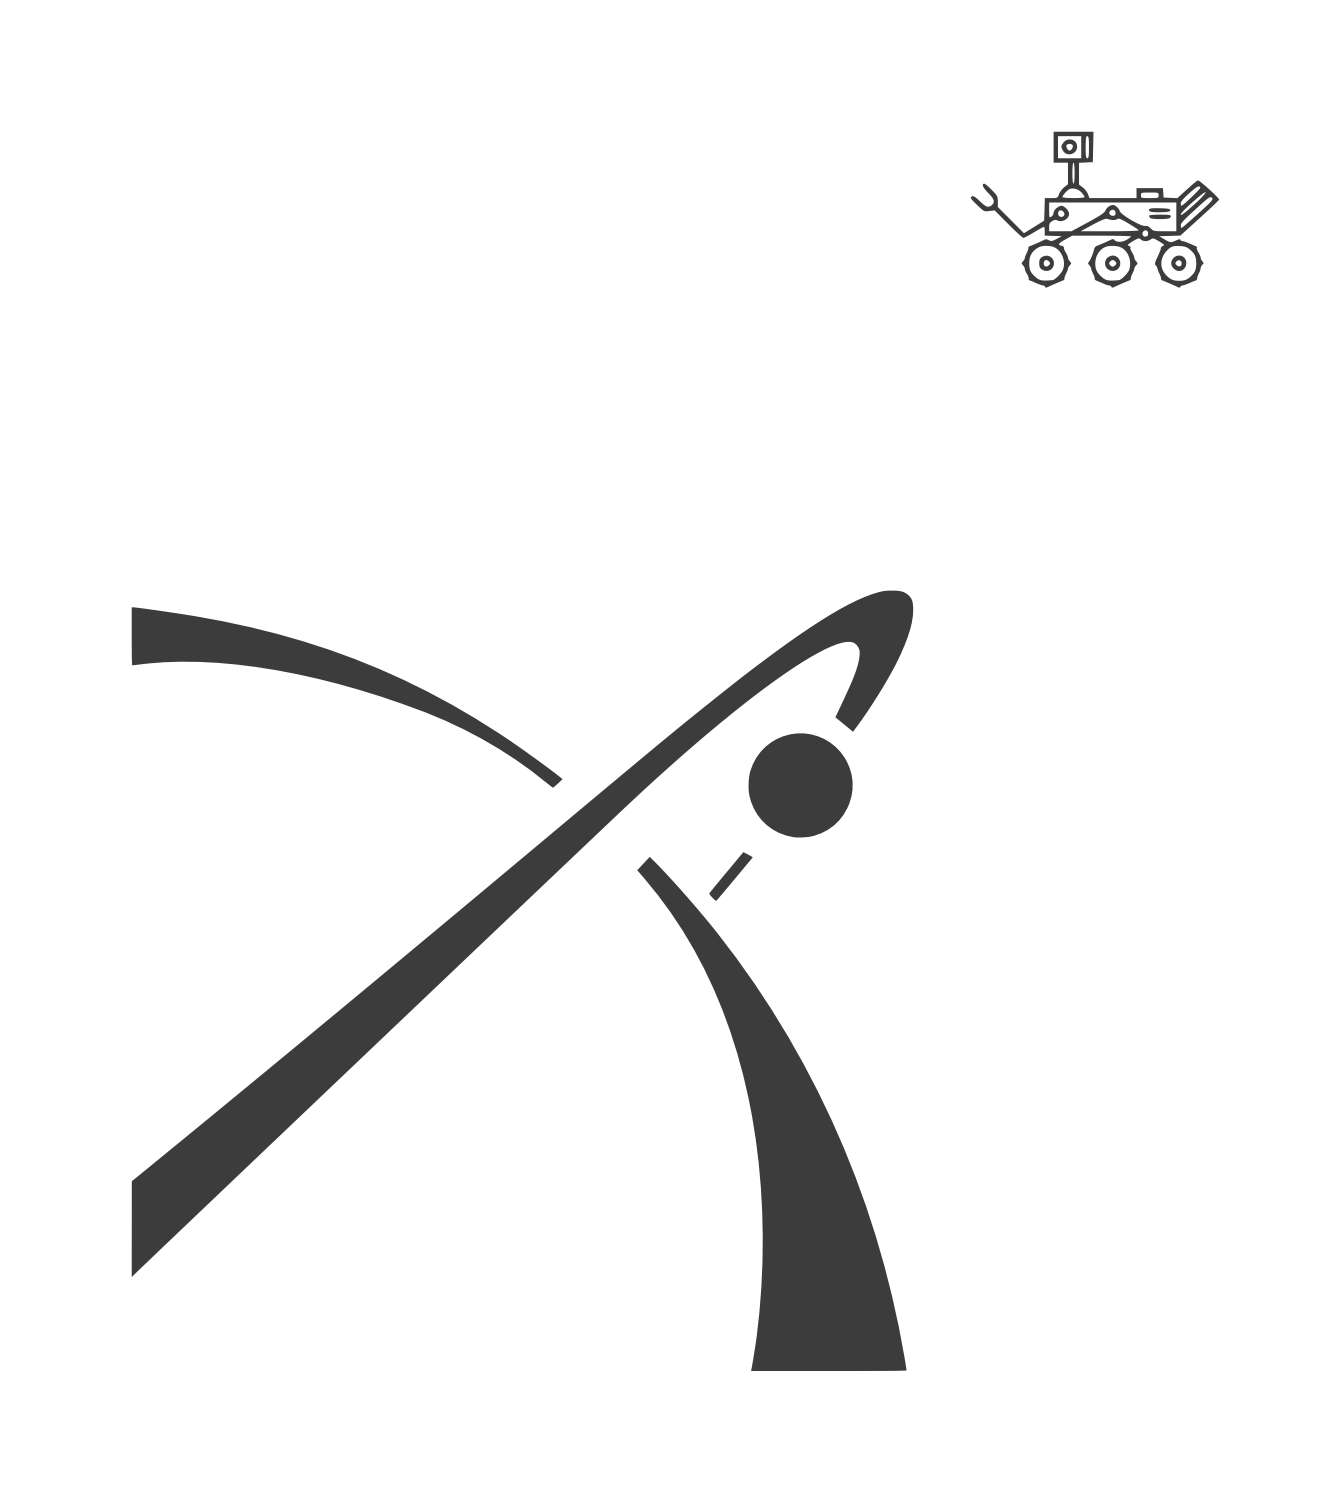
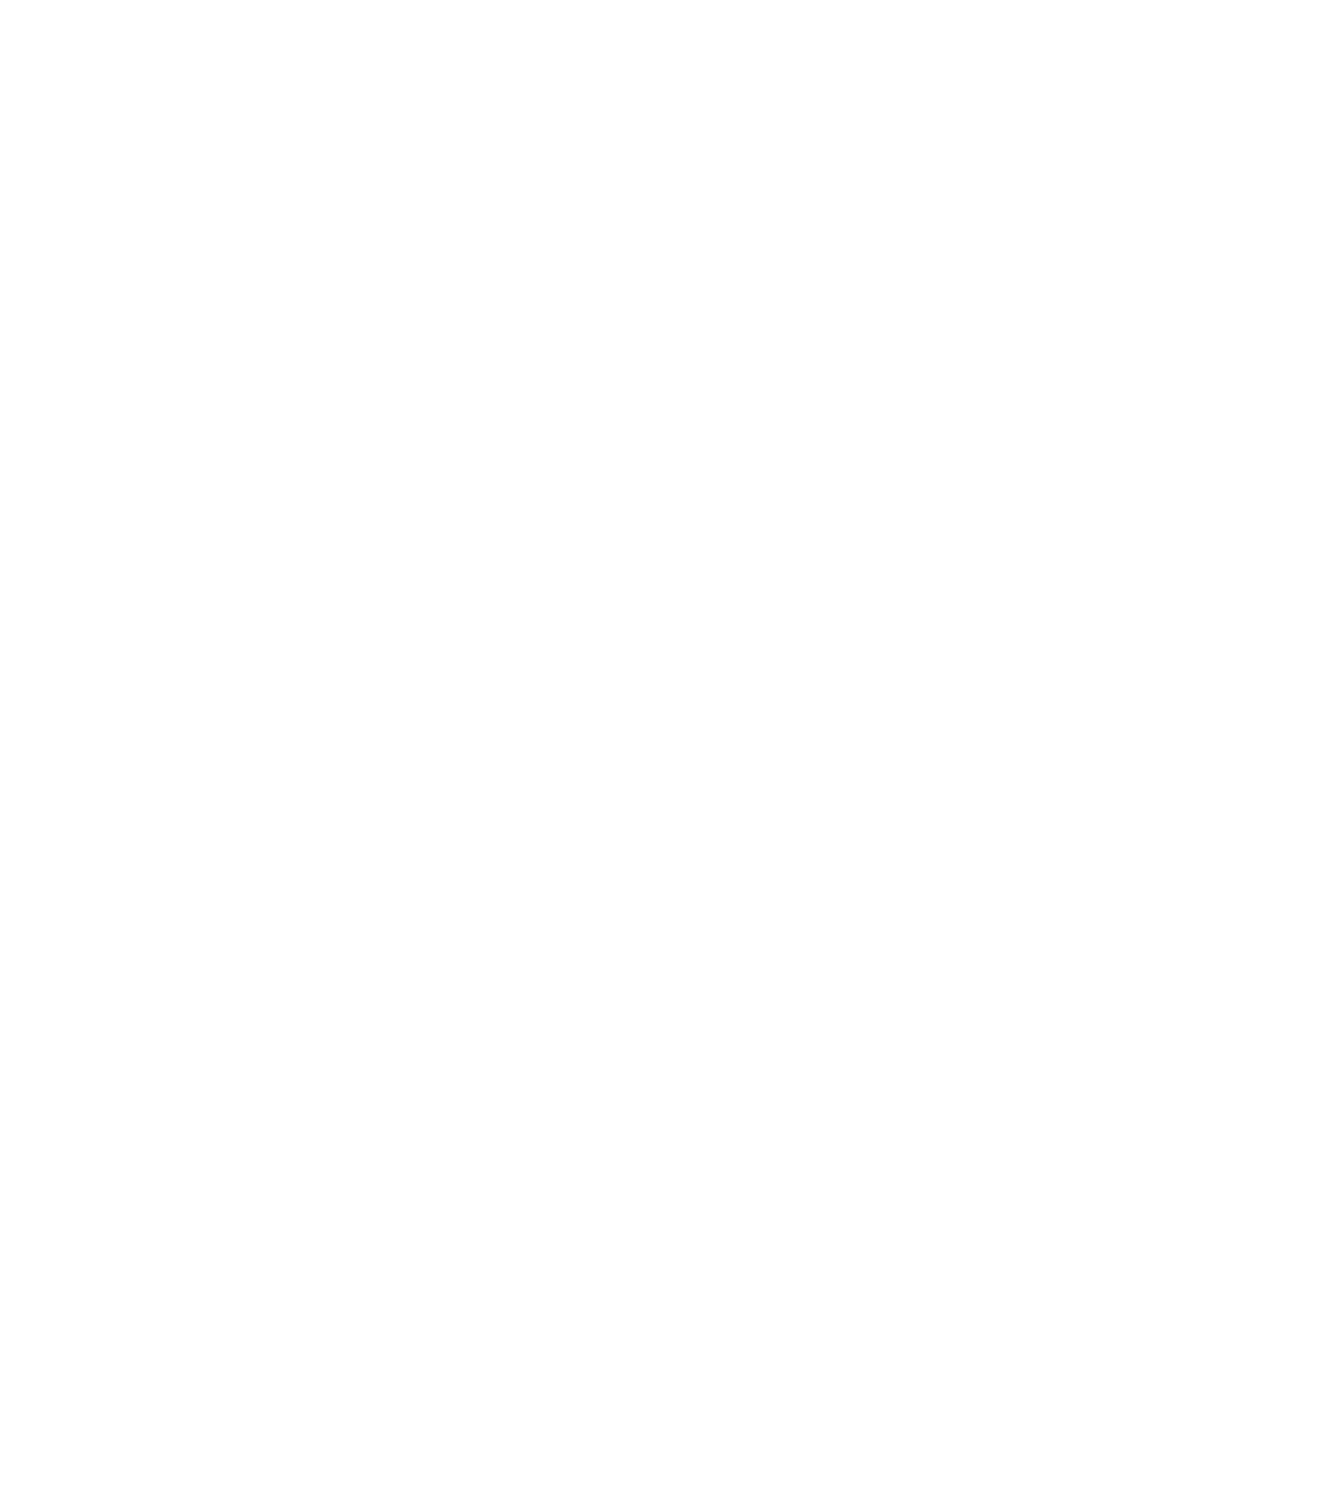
drawing: [970, 131, 1220, 288] -> none
drawing: [131, 590, 914, 1372] -> none

